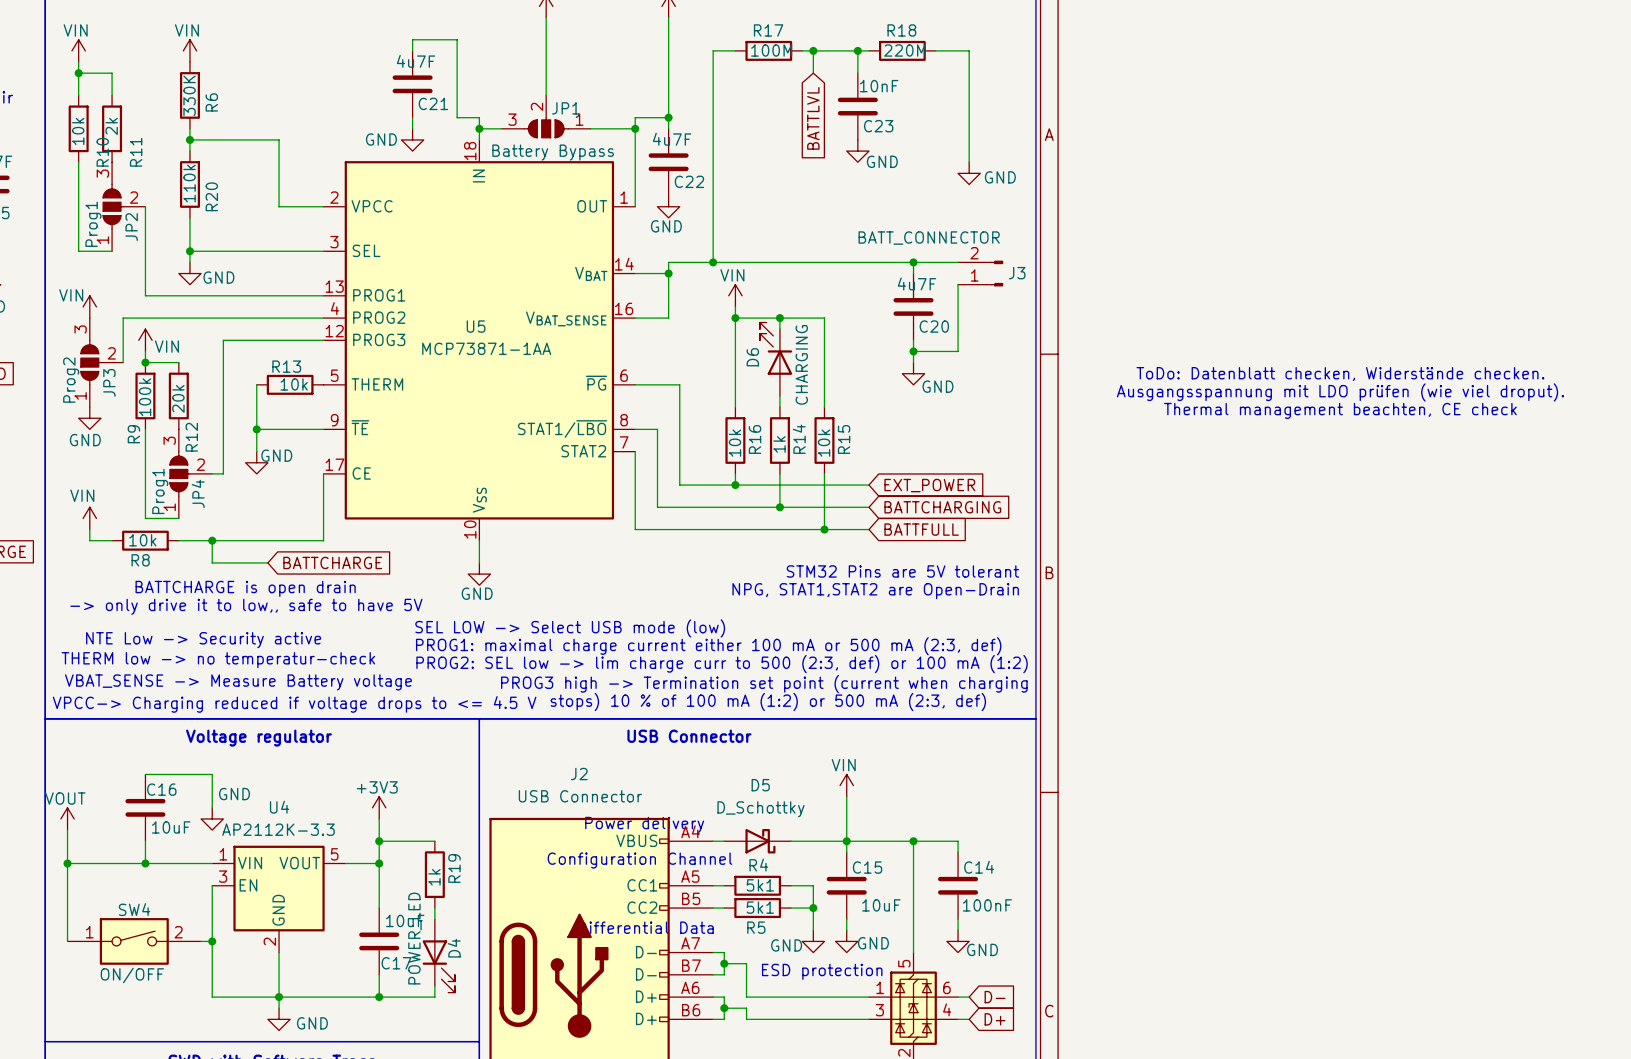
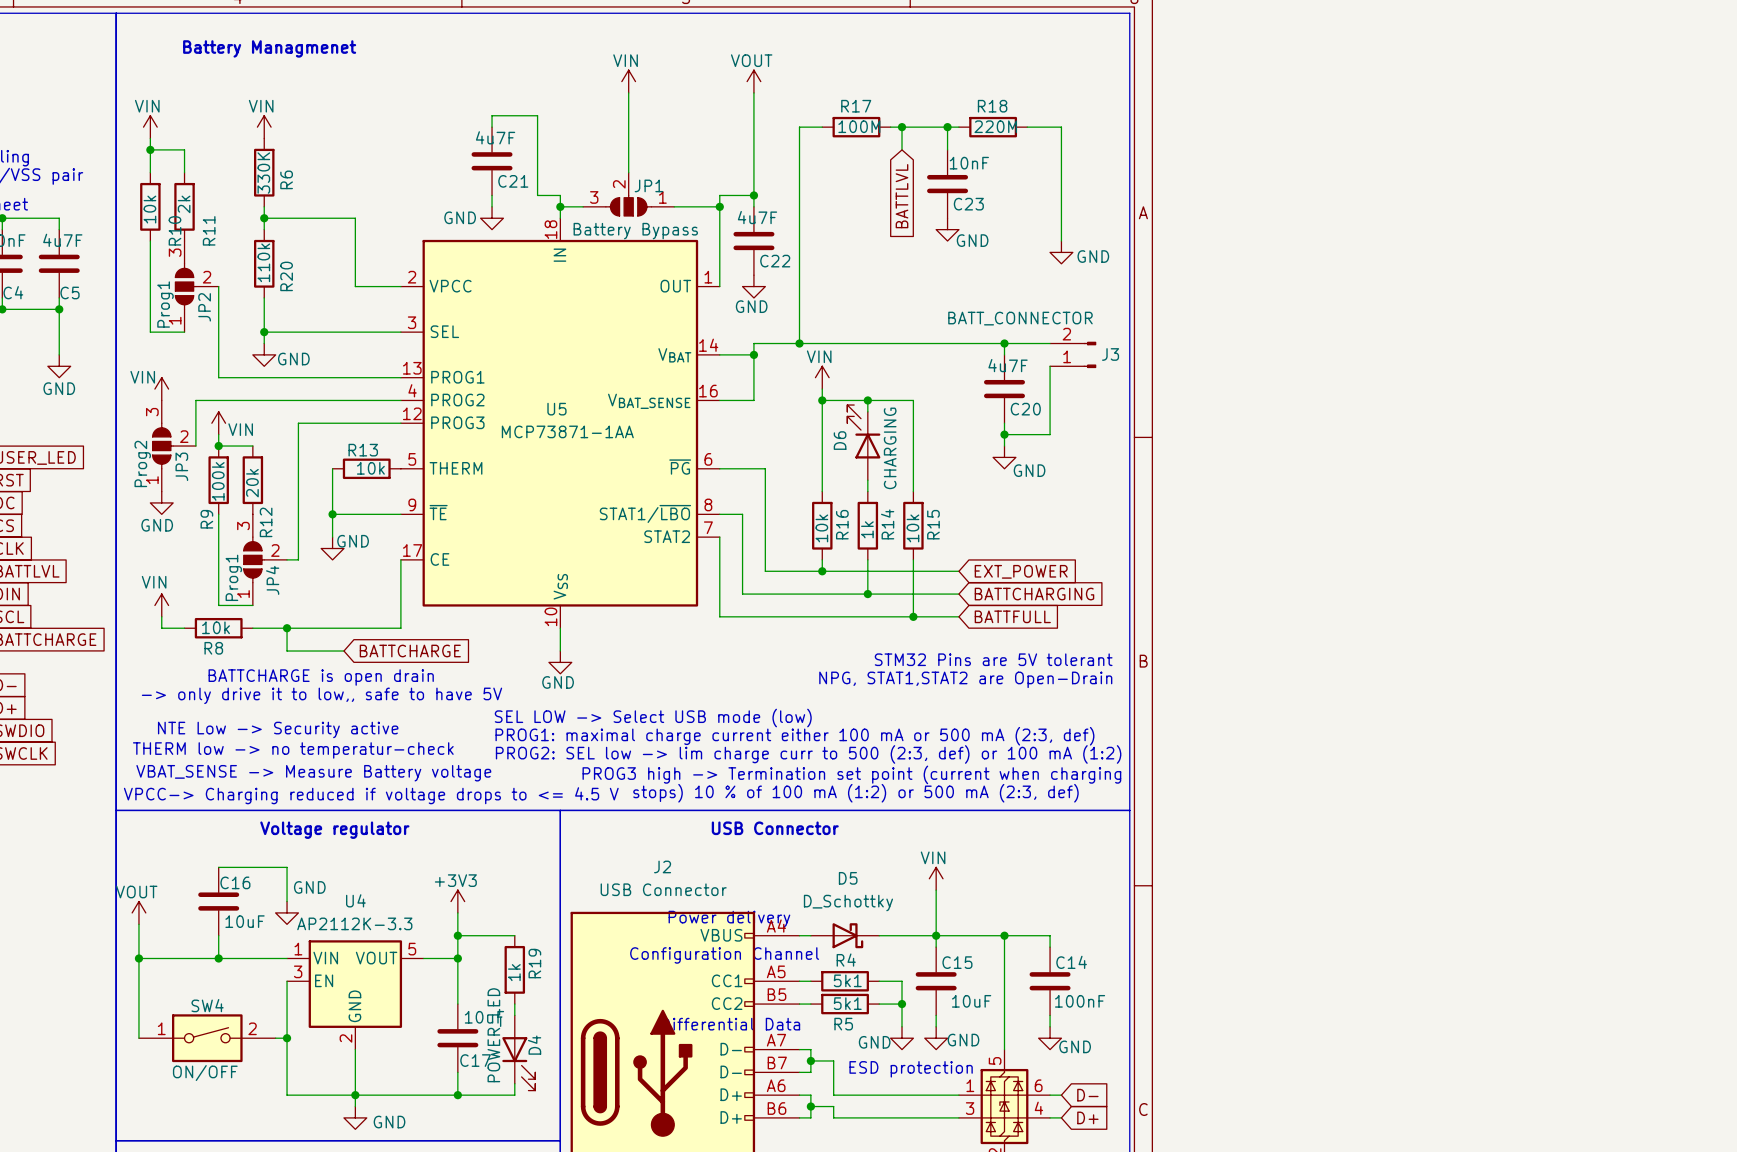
text: ToDo: Datenblatt checken, Widerstände checken. (1340, 374) -> none
text: Ausgangsspannung mit LDO prüfen (wie viel droput). (1340, 392) -> none
text: Thermal management beachten, CE check (1340, 410) -> none

